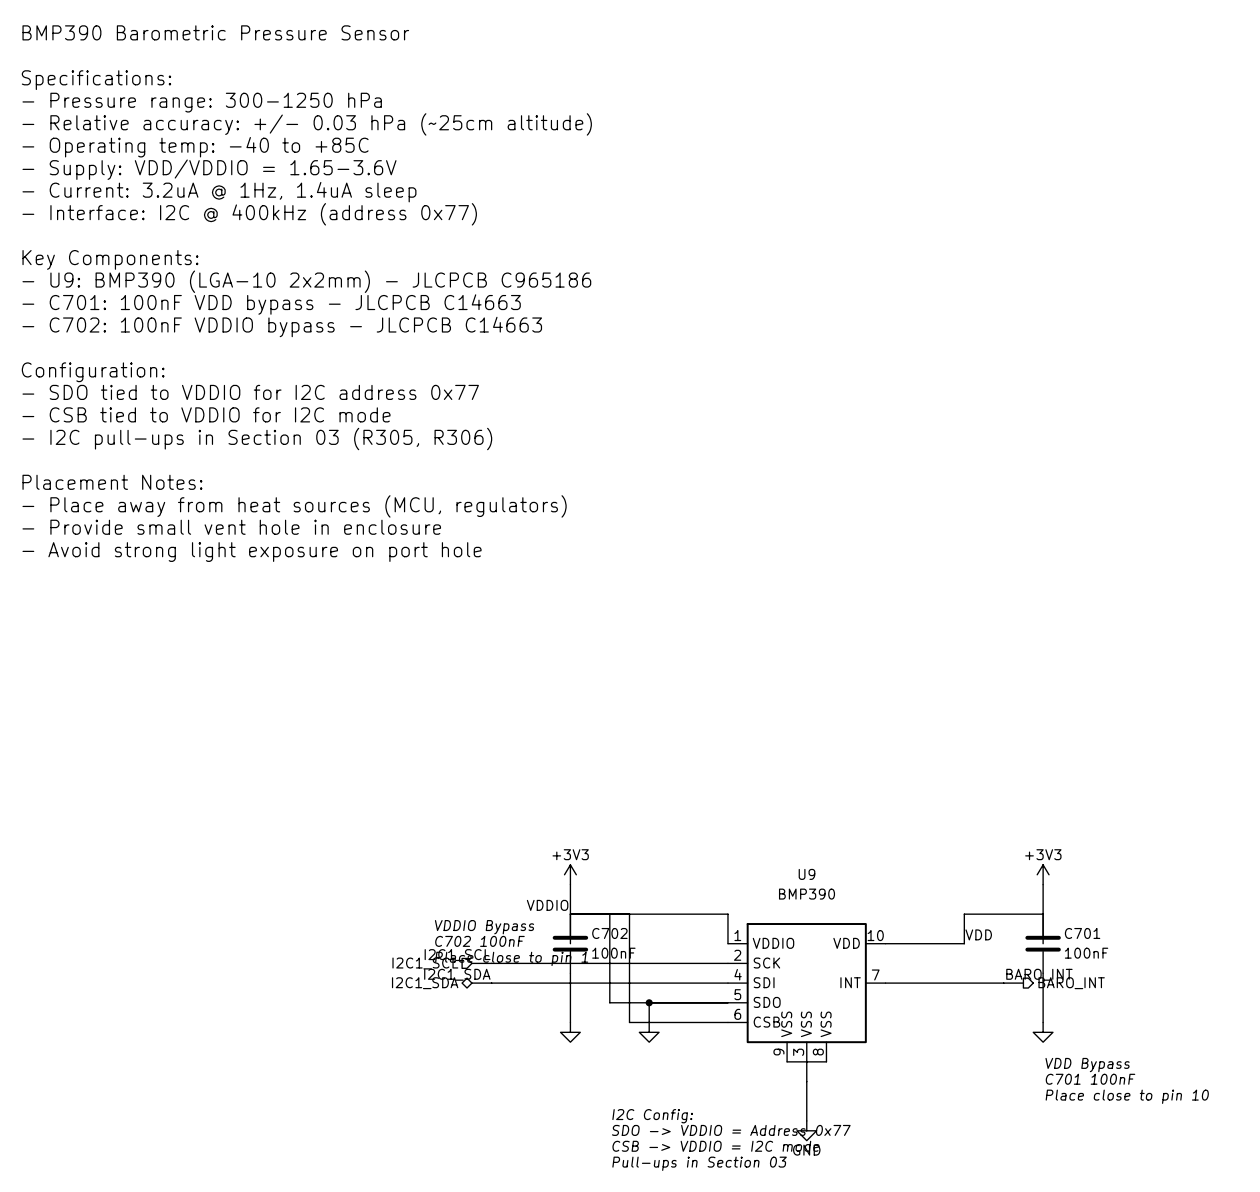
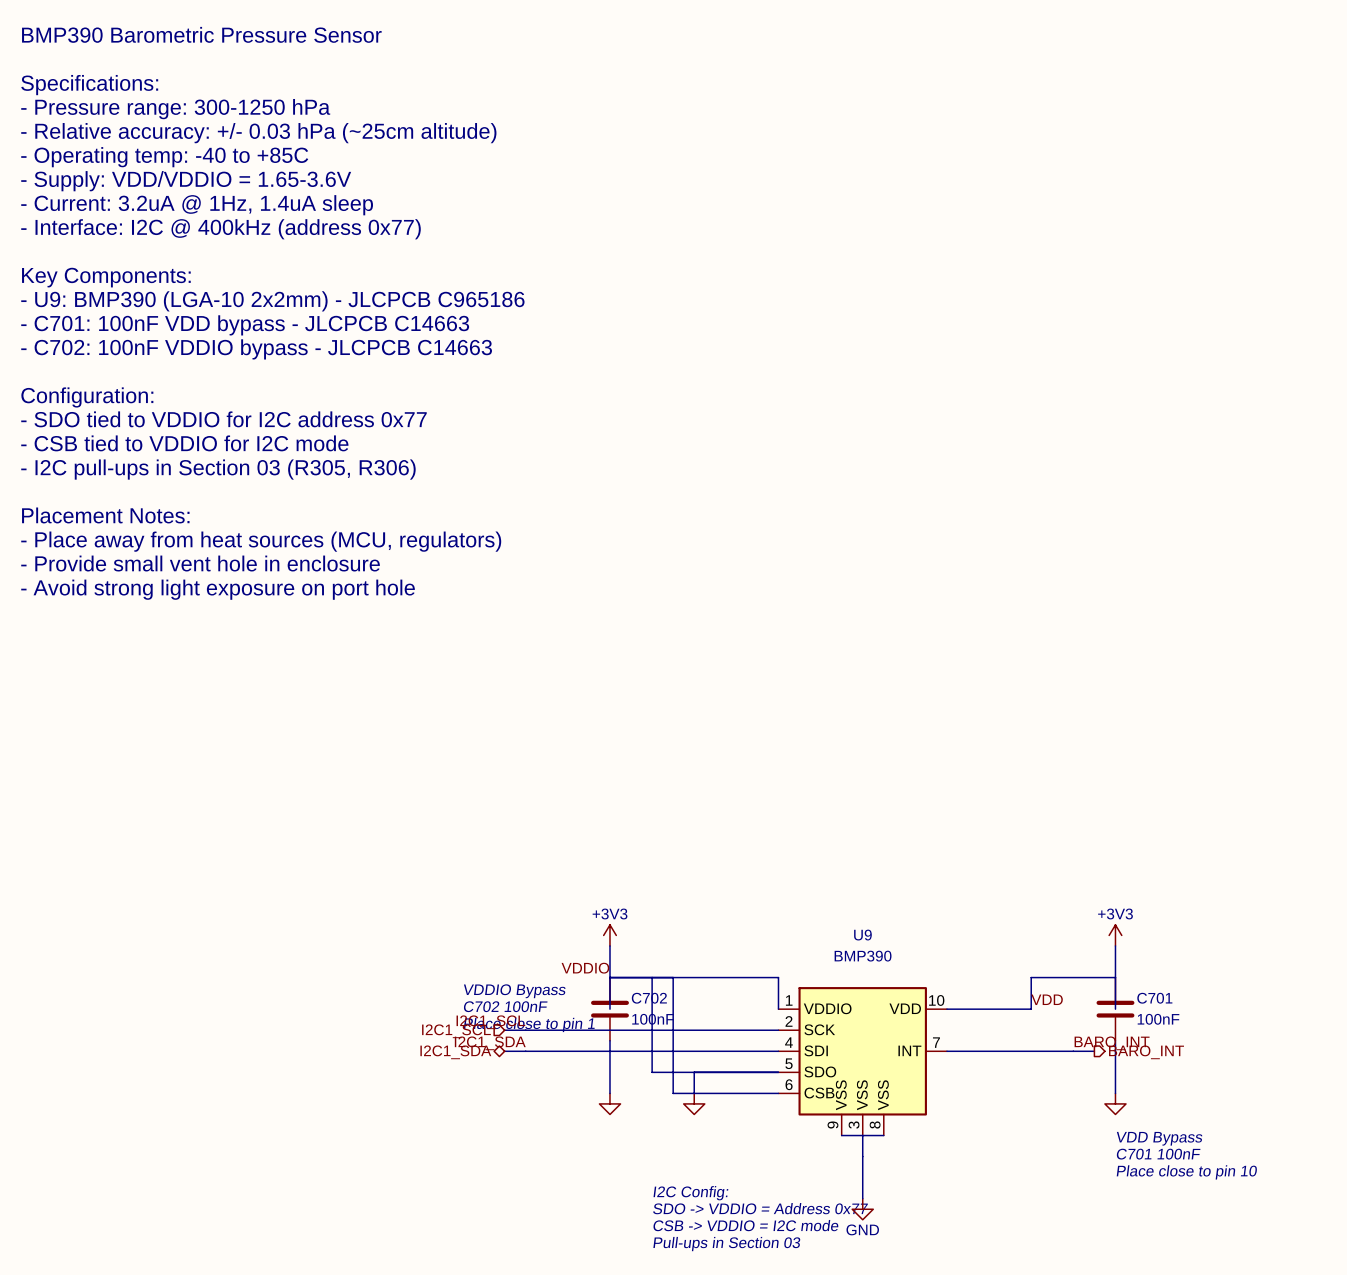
junction: (649, 1002) -> none

